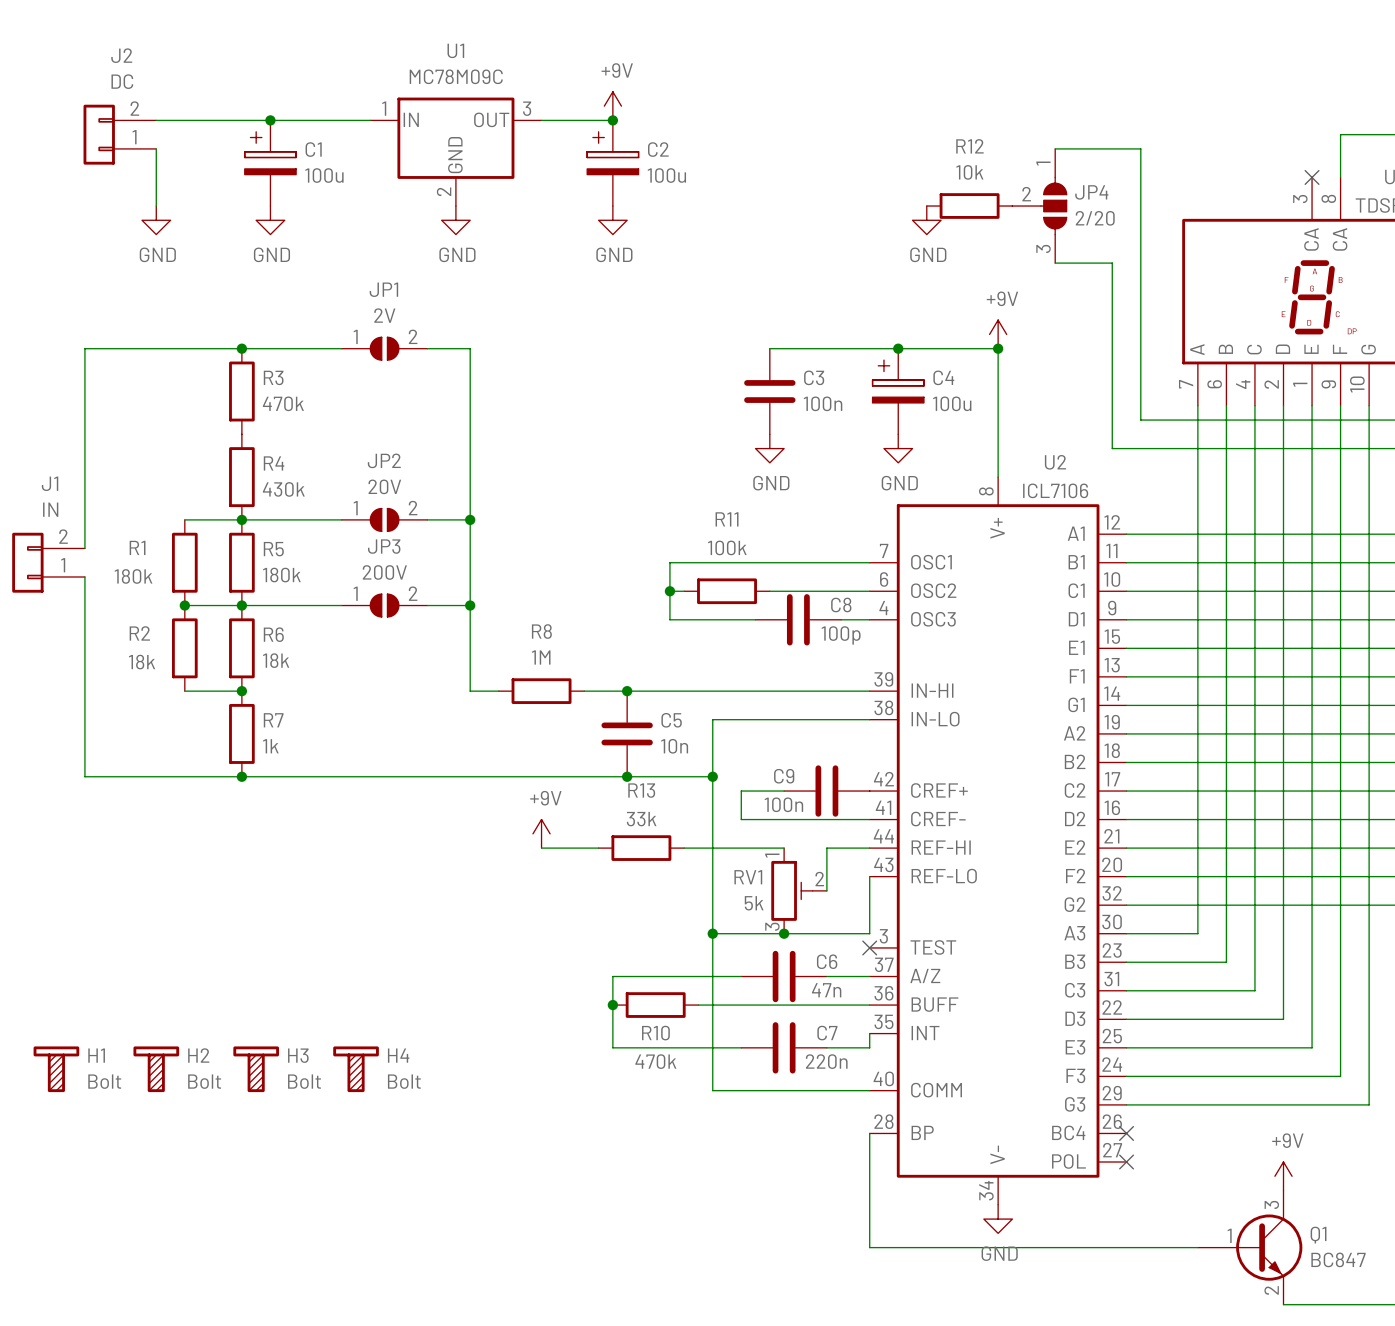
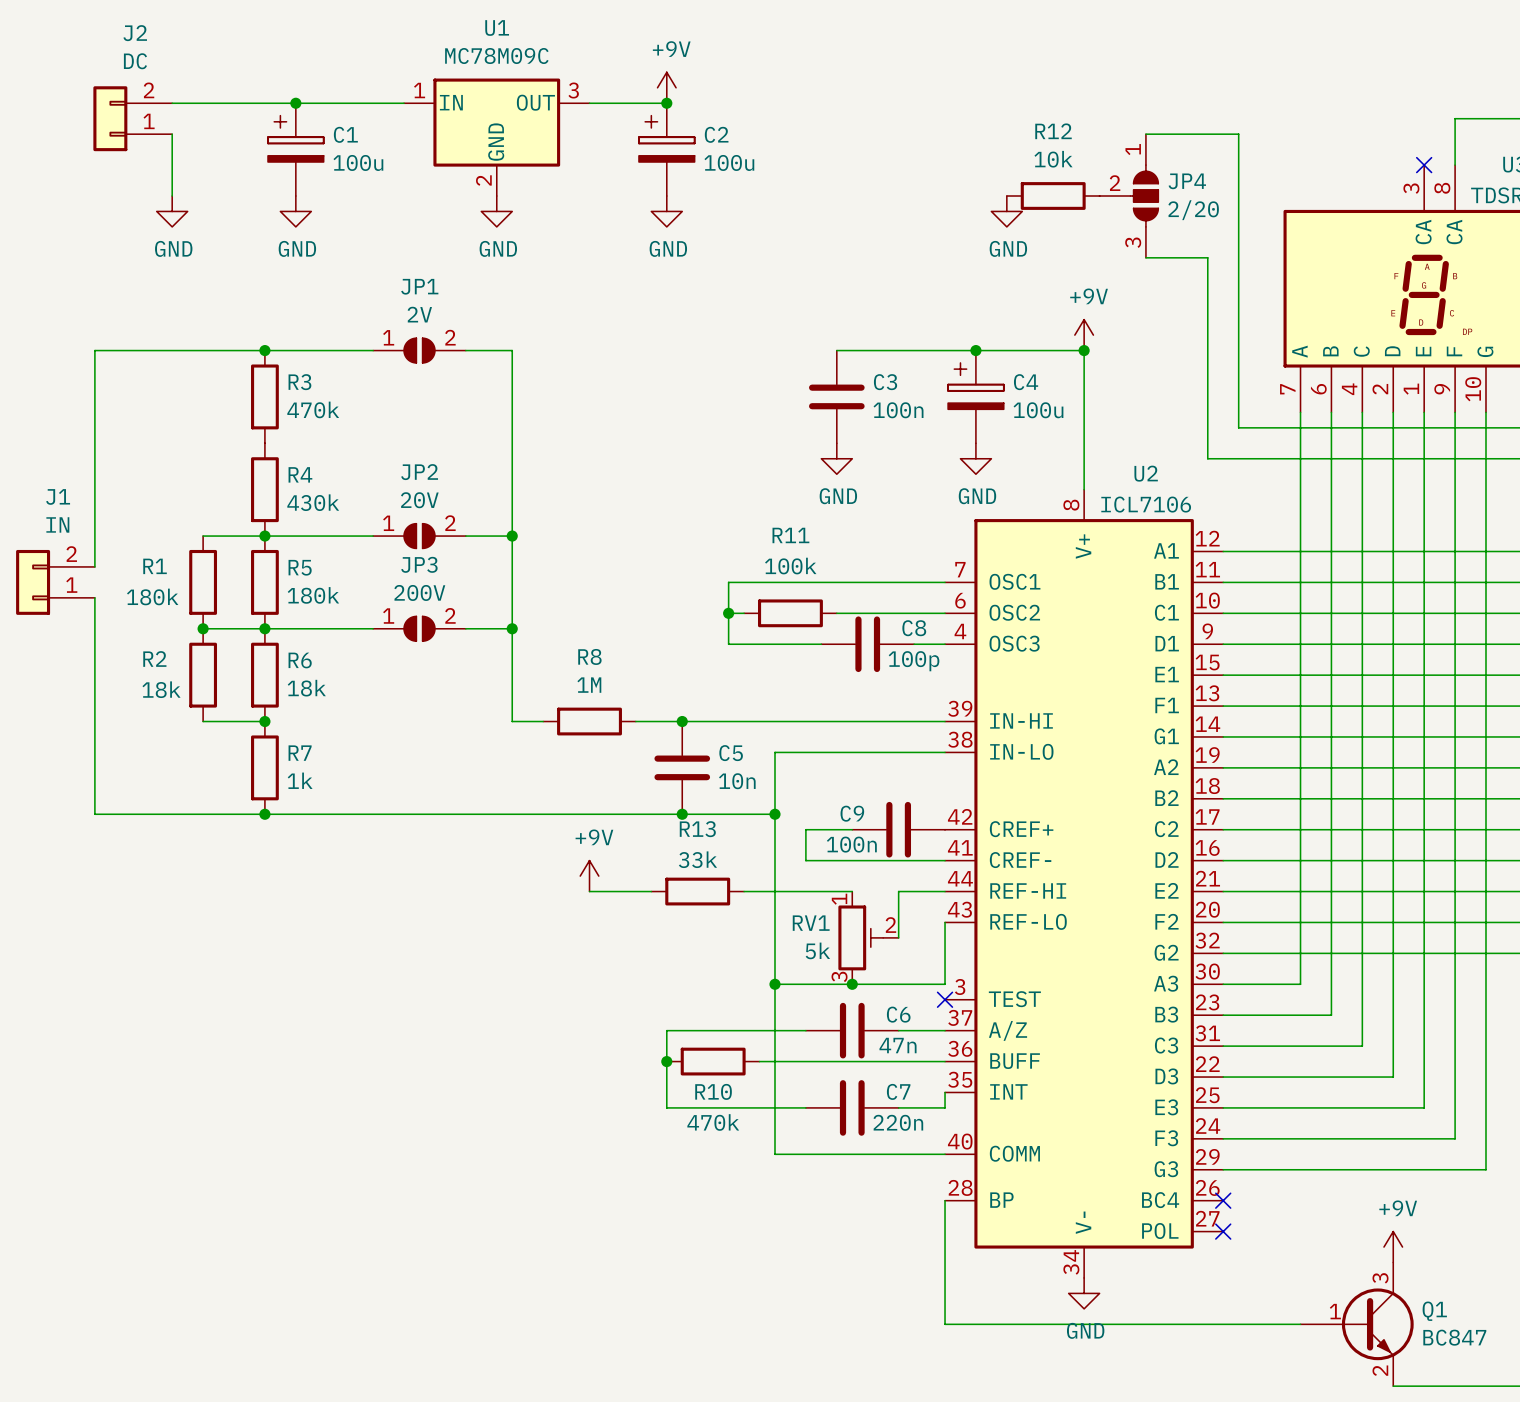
H1: Bolt (56, 1069) -> none
H2: Bolt (156, 1069) -> none
H3: Bolt (256, 1069) -> none
H4: Bolt (356, 1069) -> none

